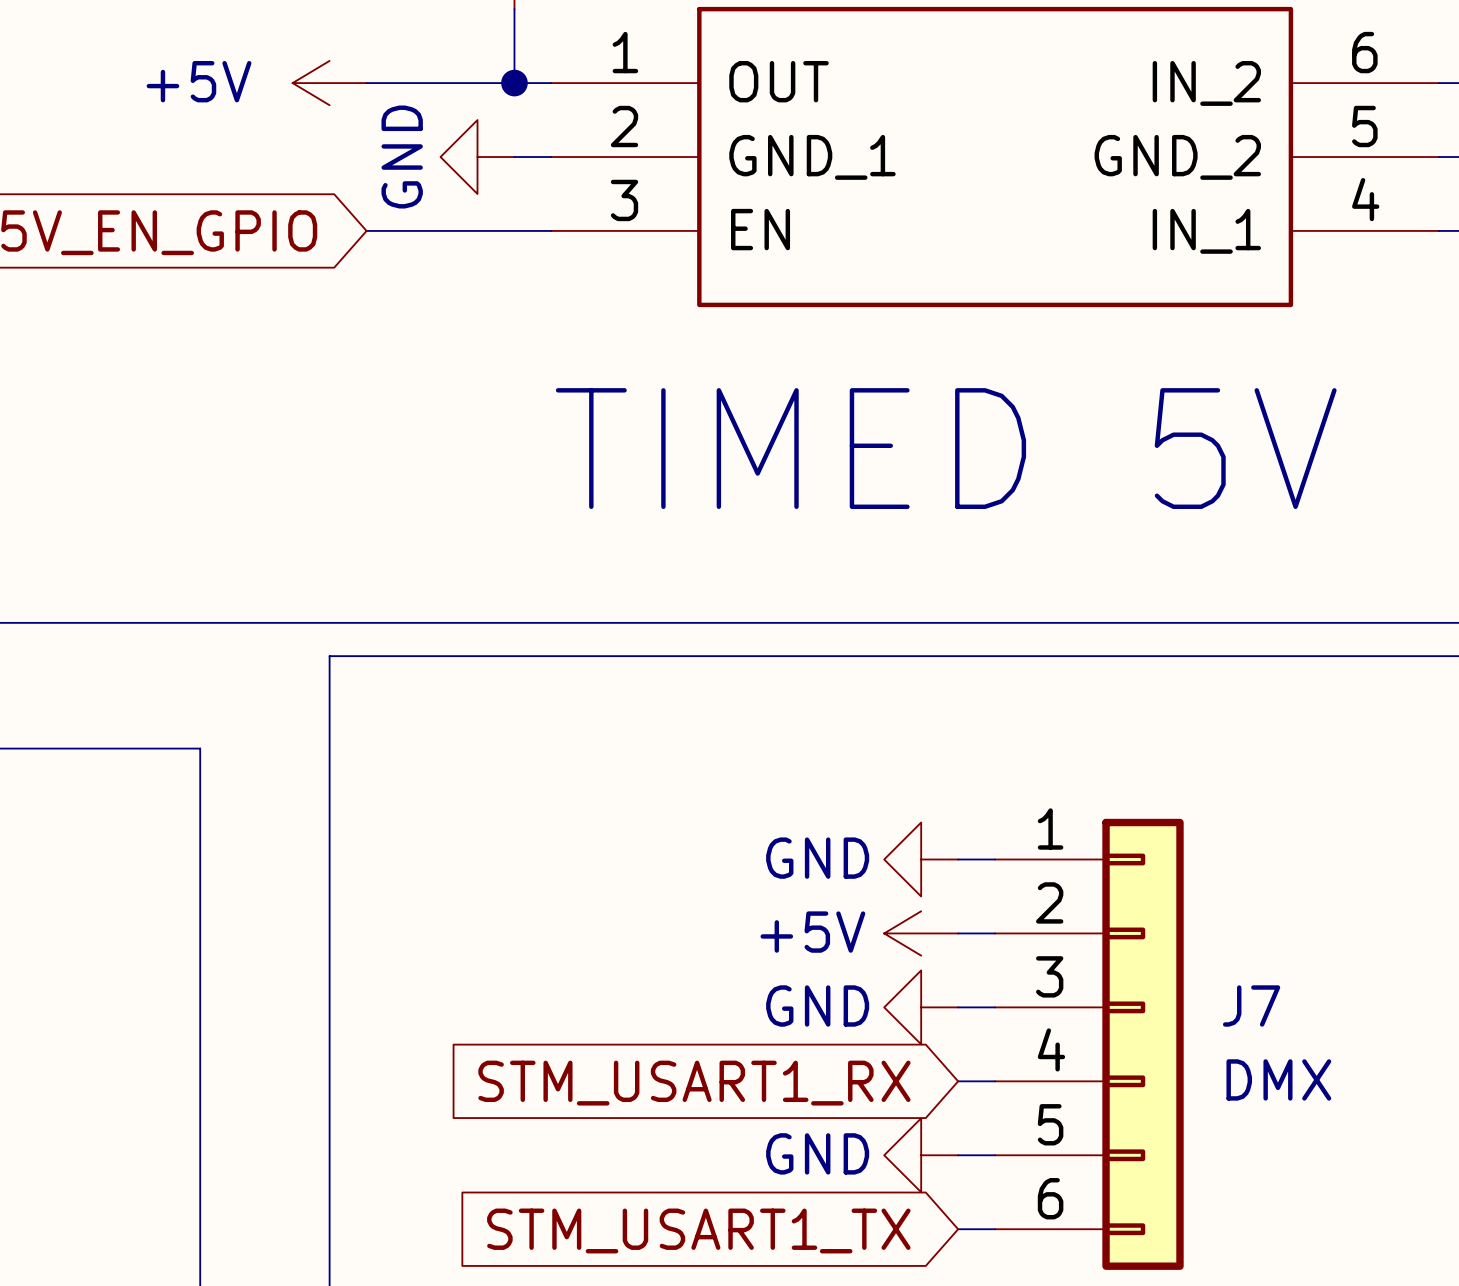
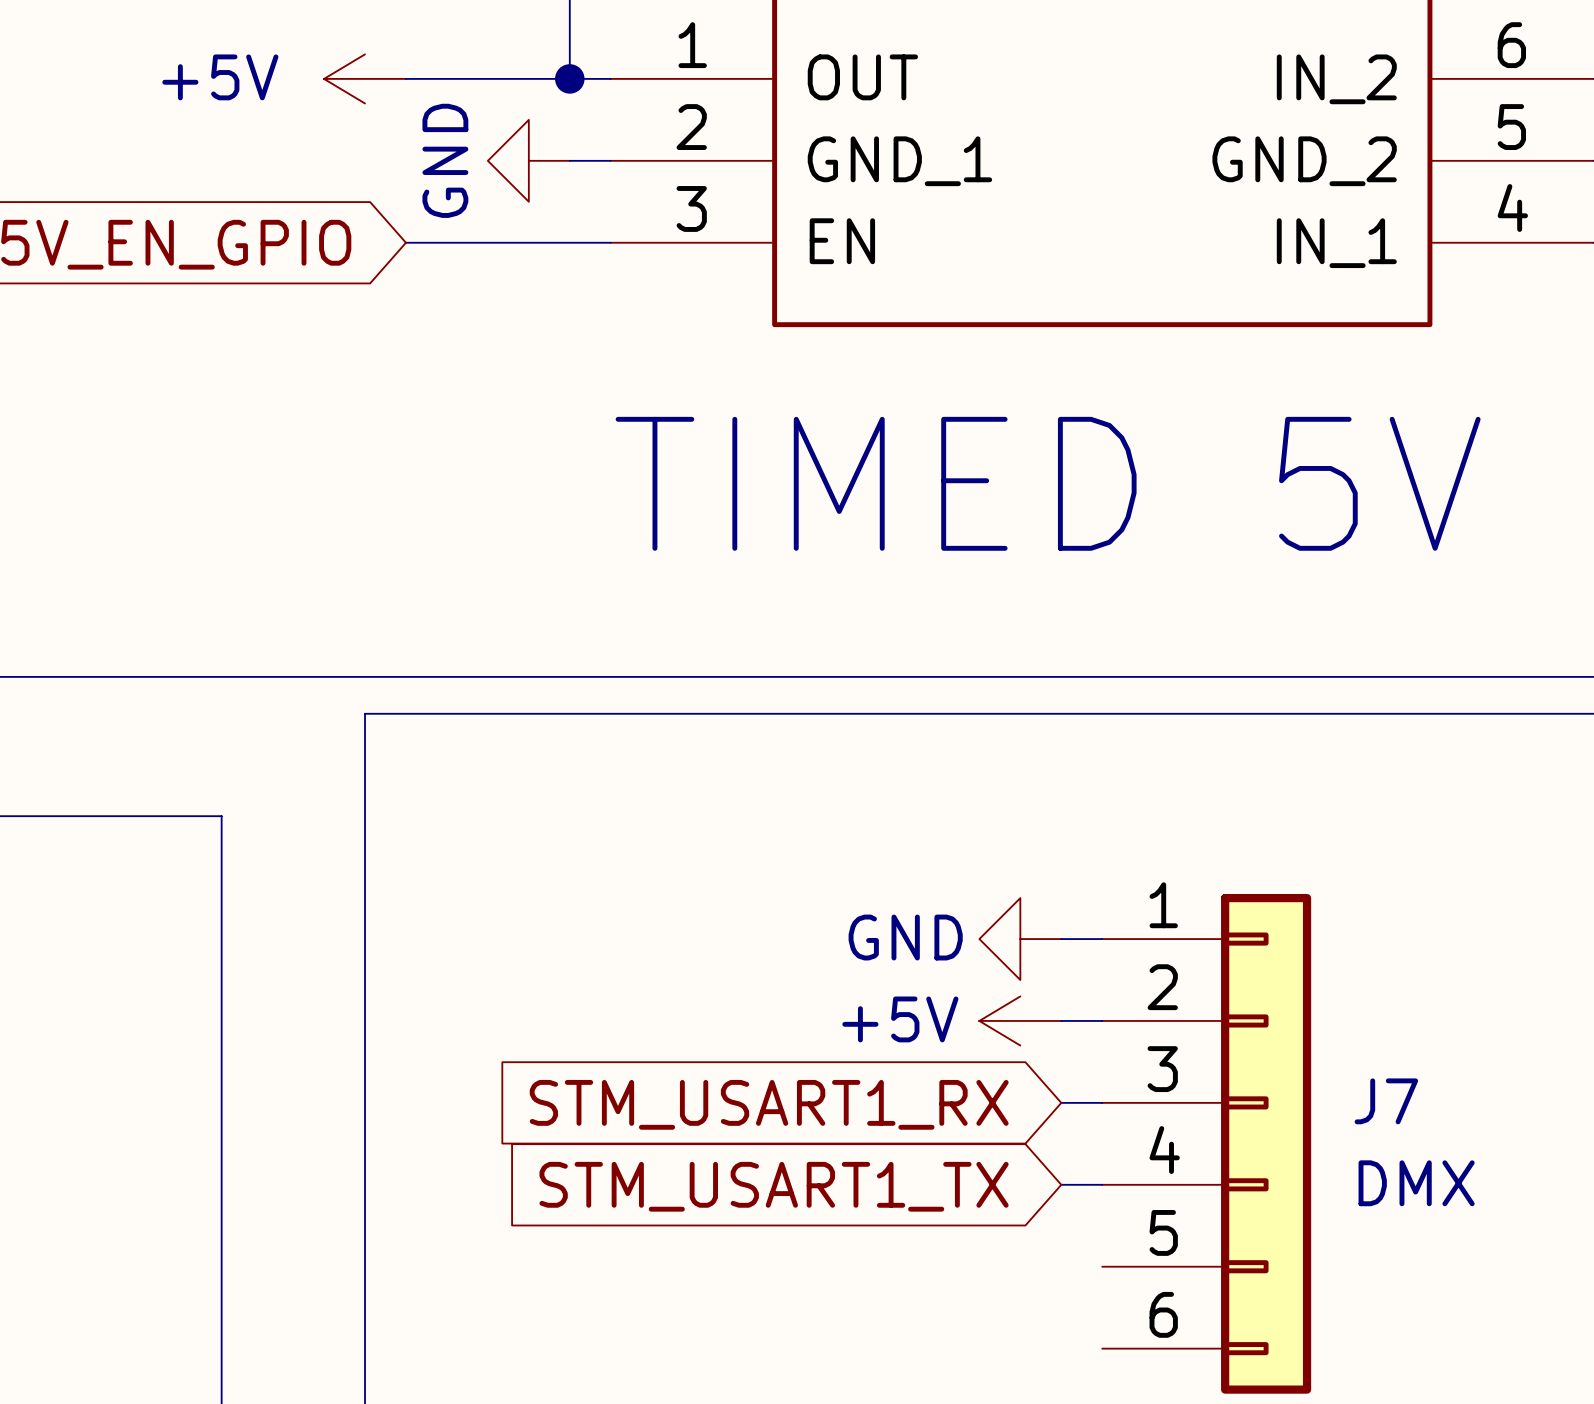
power symbol: GND (921, 1007) -> none
global label: none -> STM_USART1_RX (769, 1104)
global label: STM_USART1_RX (694, 1083) -> STM_USART1_TX (774, 1186)
power symbol: GND (921, 1155) -> none
wire: (958, 1155) (995, 1155) -> none
wire: (958, 1229) (995, 1229) -> none
global label: STM_USART1_TX (698, 1230) -> none

